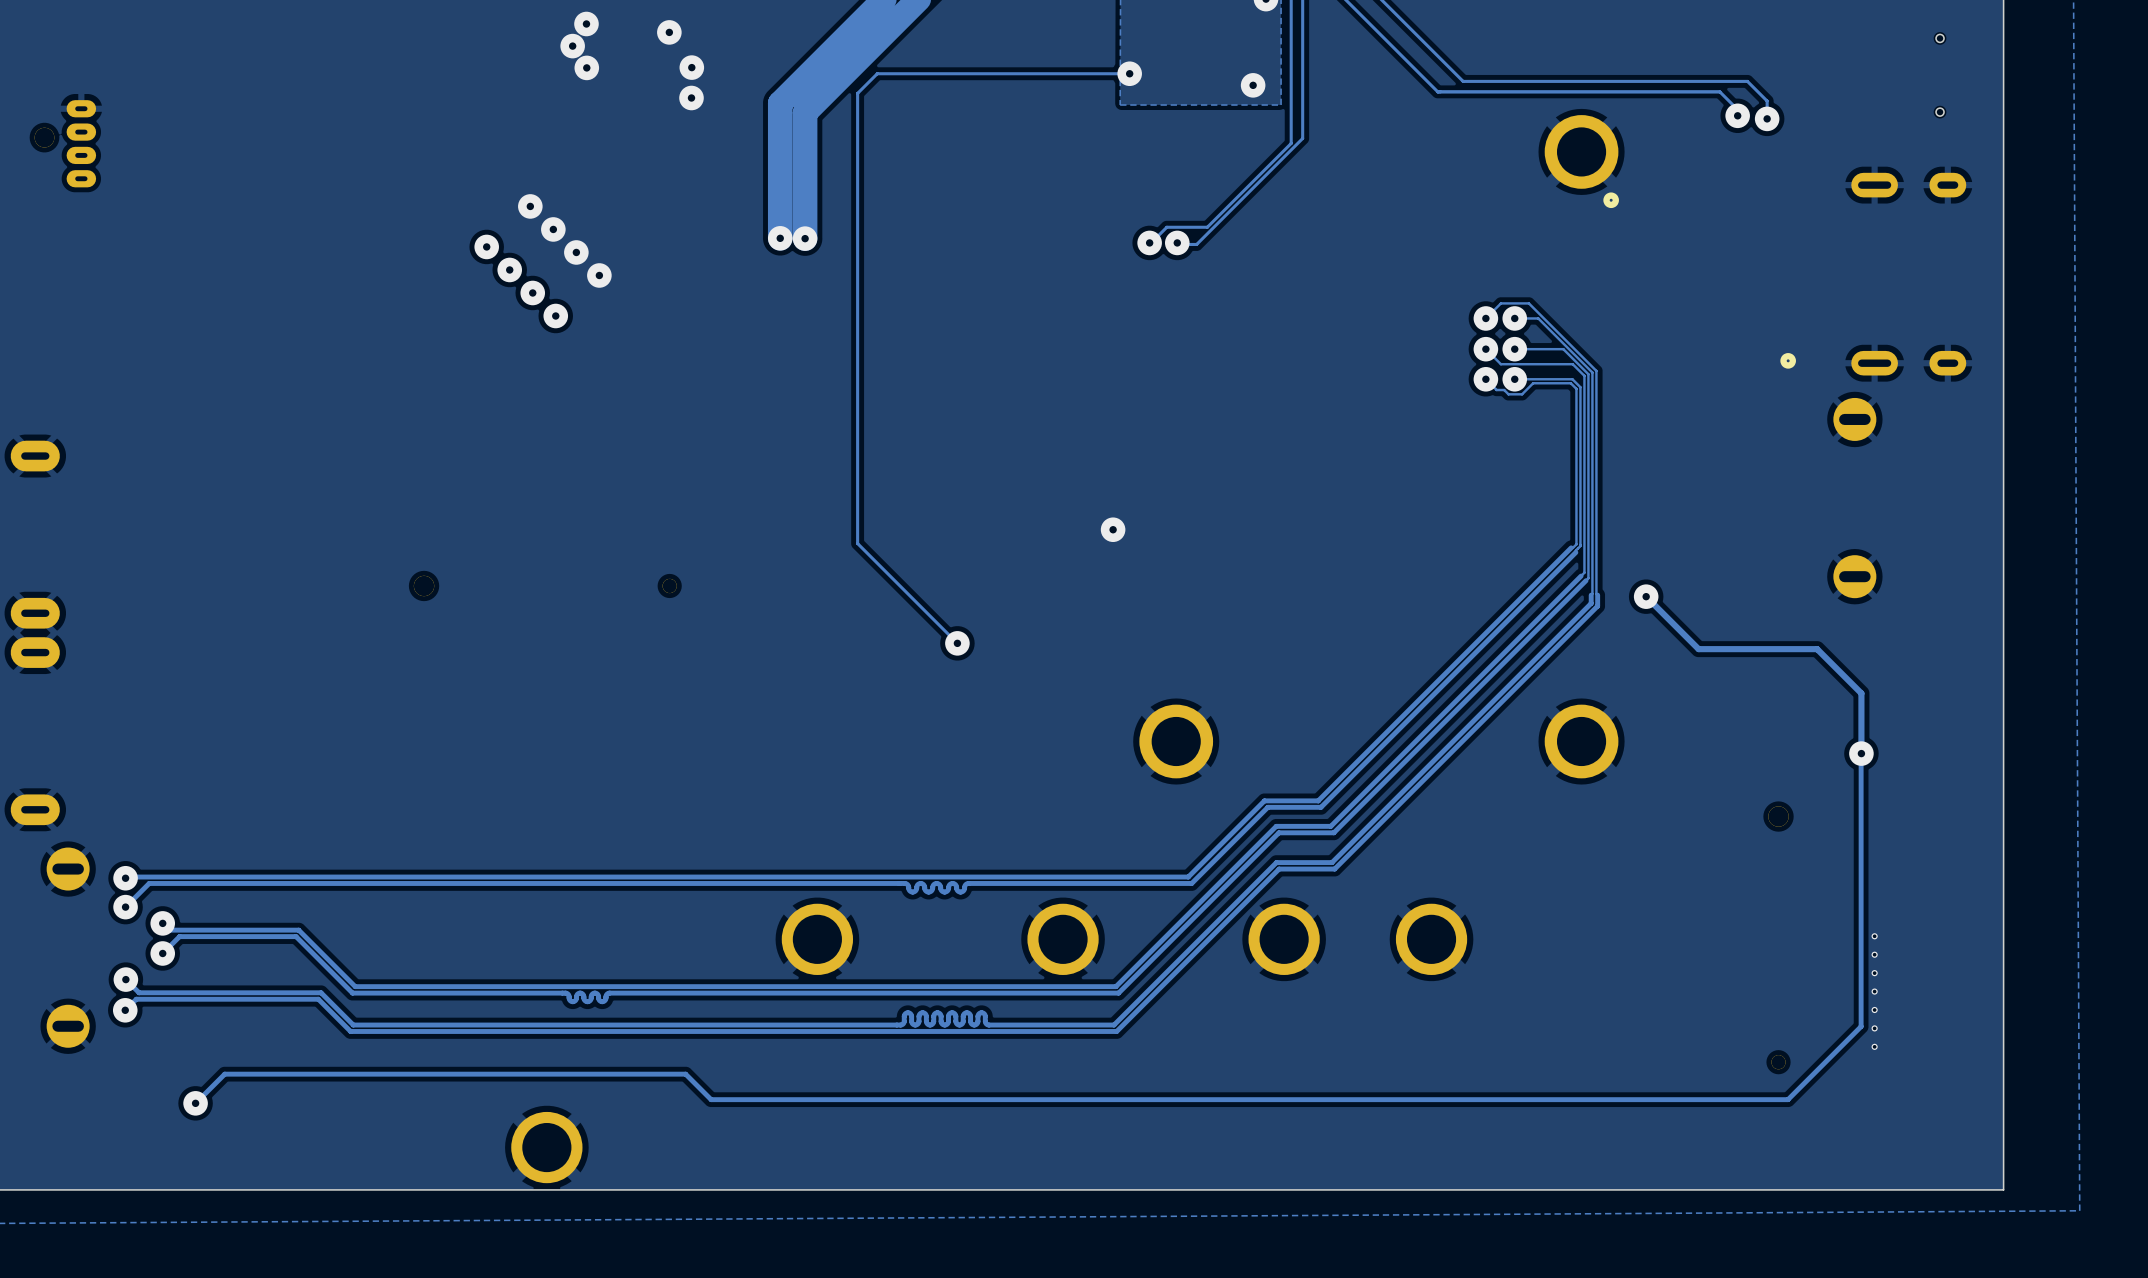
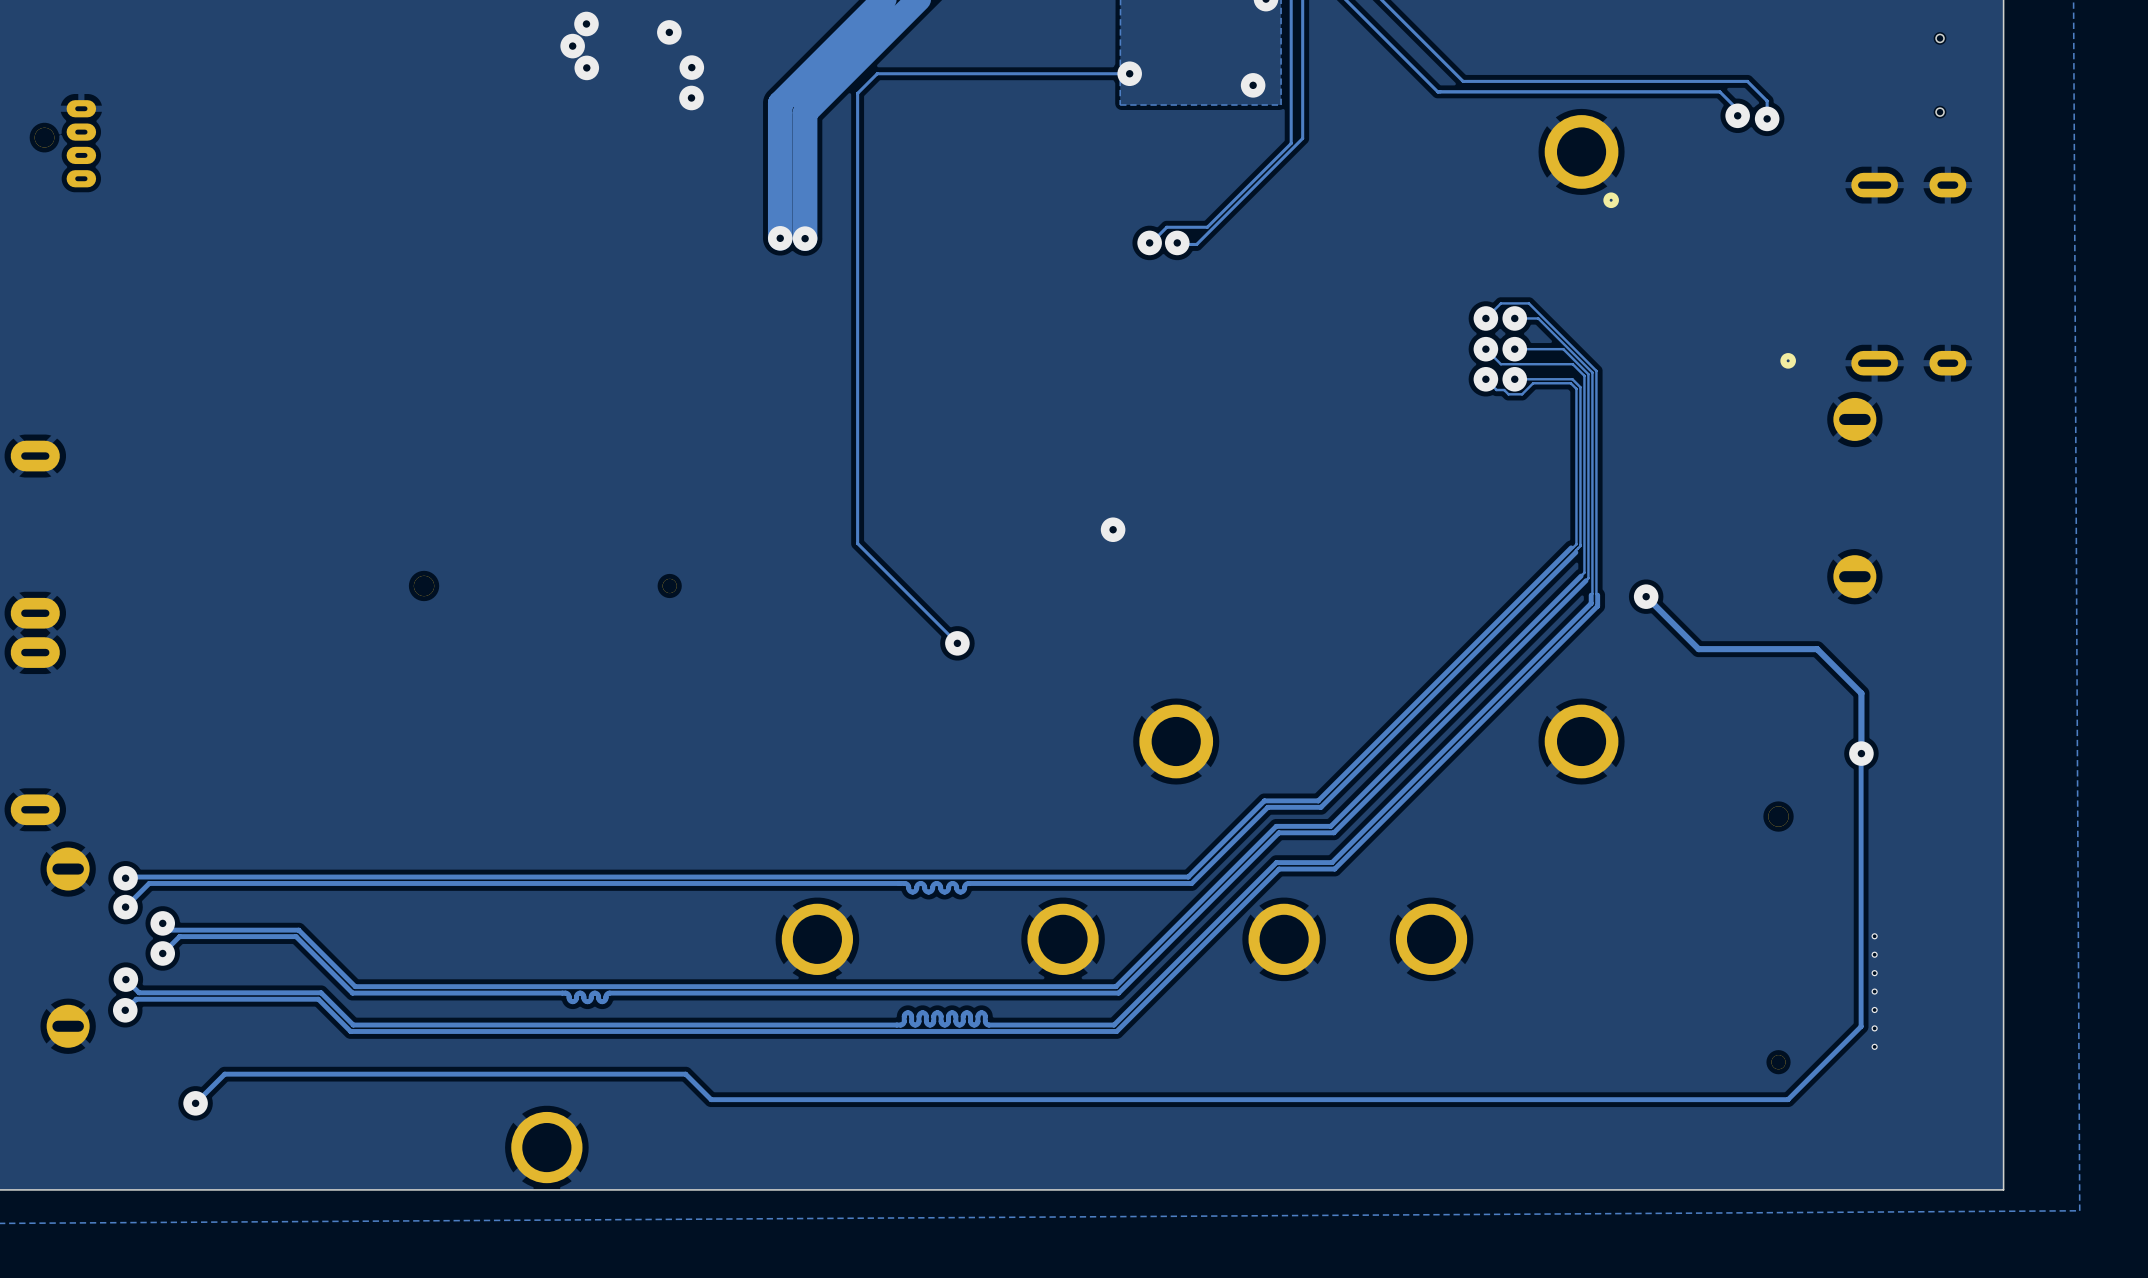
via: (530, 206) -> none
via: (553, 229) -> none
via: (486, 246) -> none
via: (576, 252) -> none
via: (509, 269) -> none
via: (599, 275) -> none
via: (532, 292) -> none
via: (555, 316) -> none

